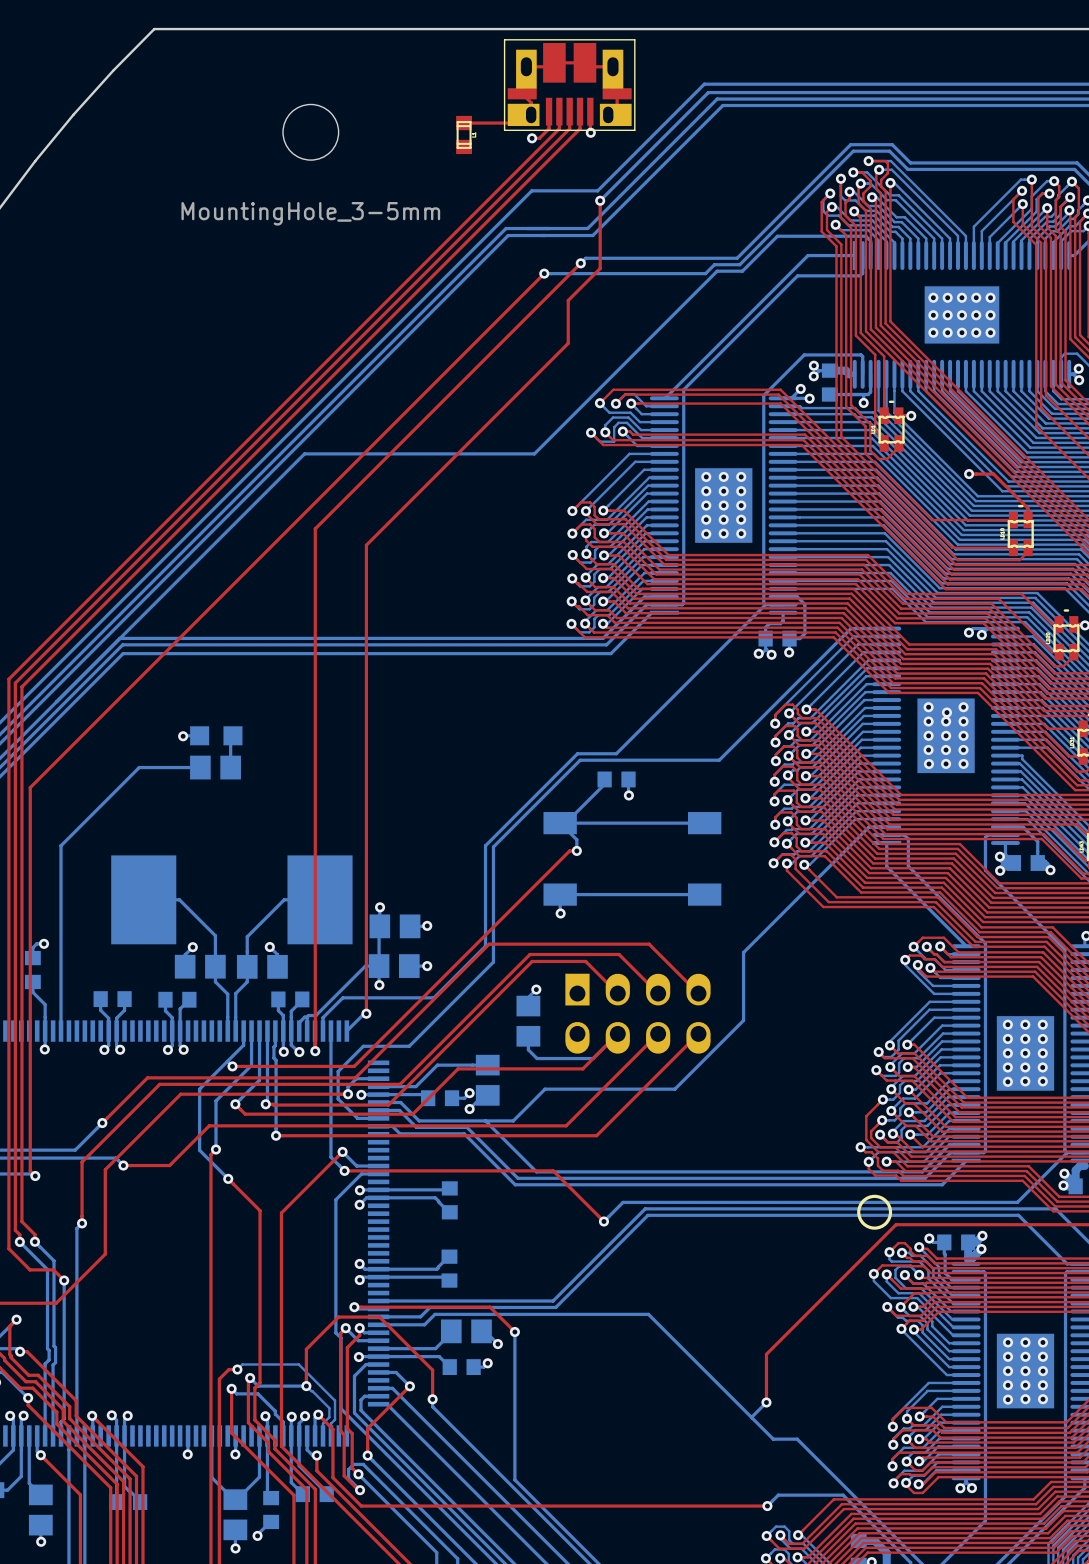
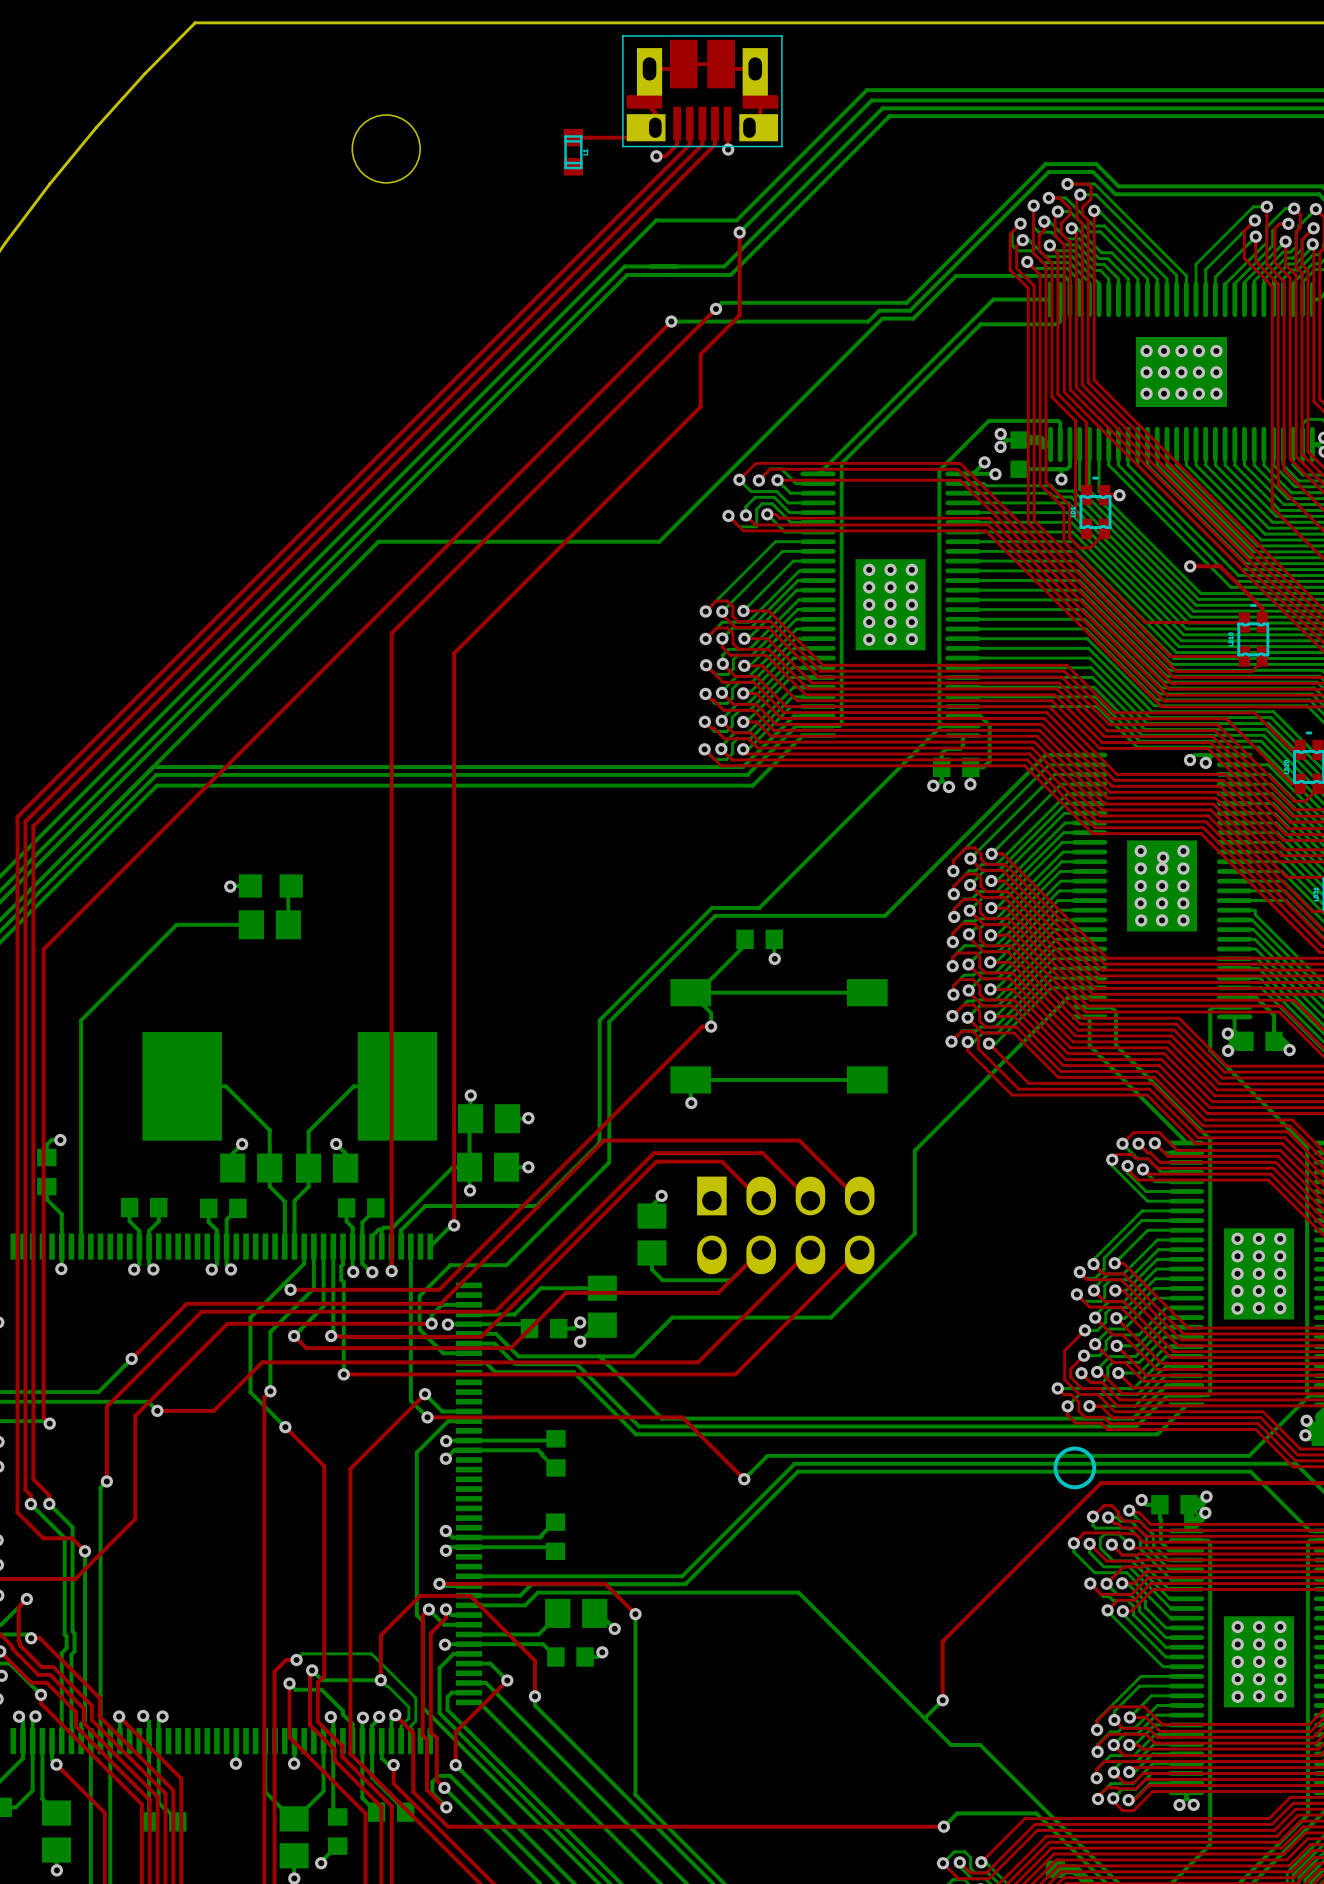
part value: MountingHole_3-5mm (310, 213) -> none

